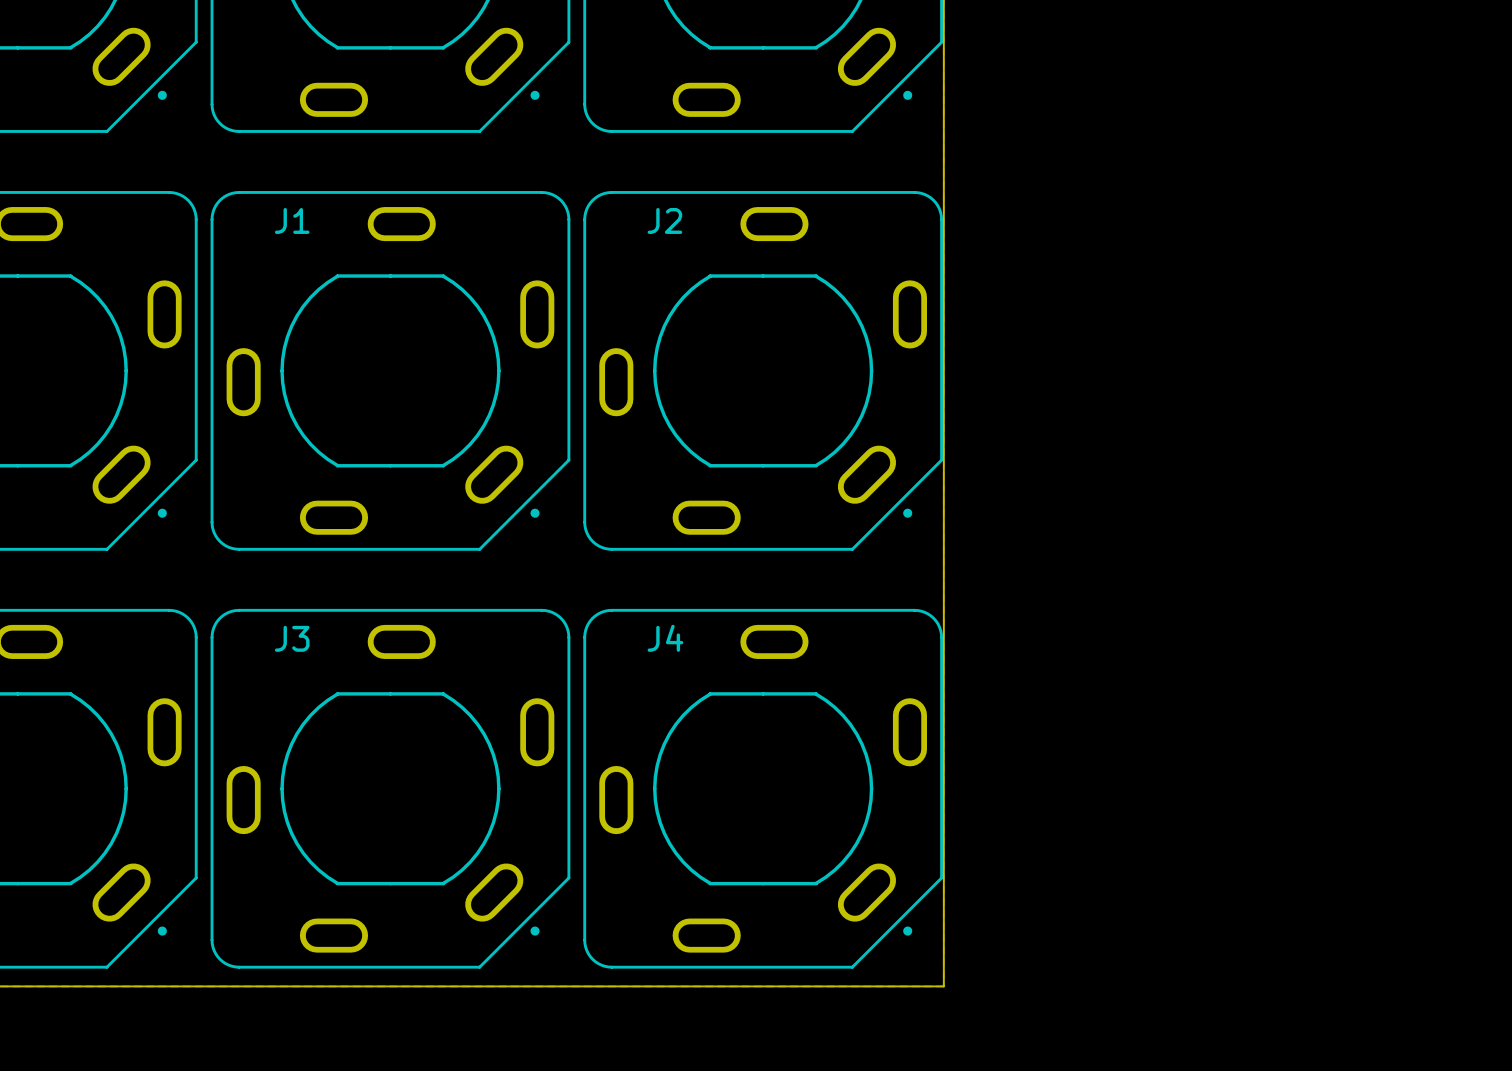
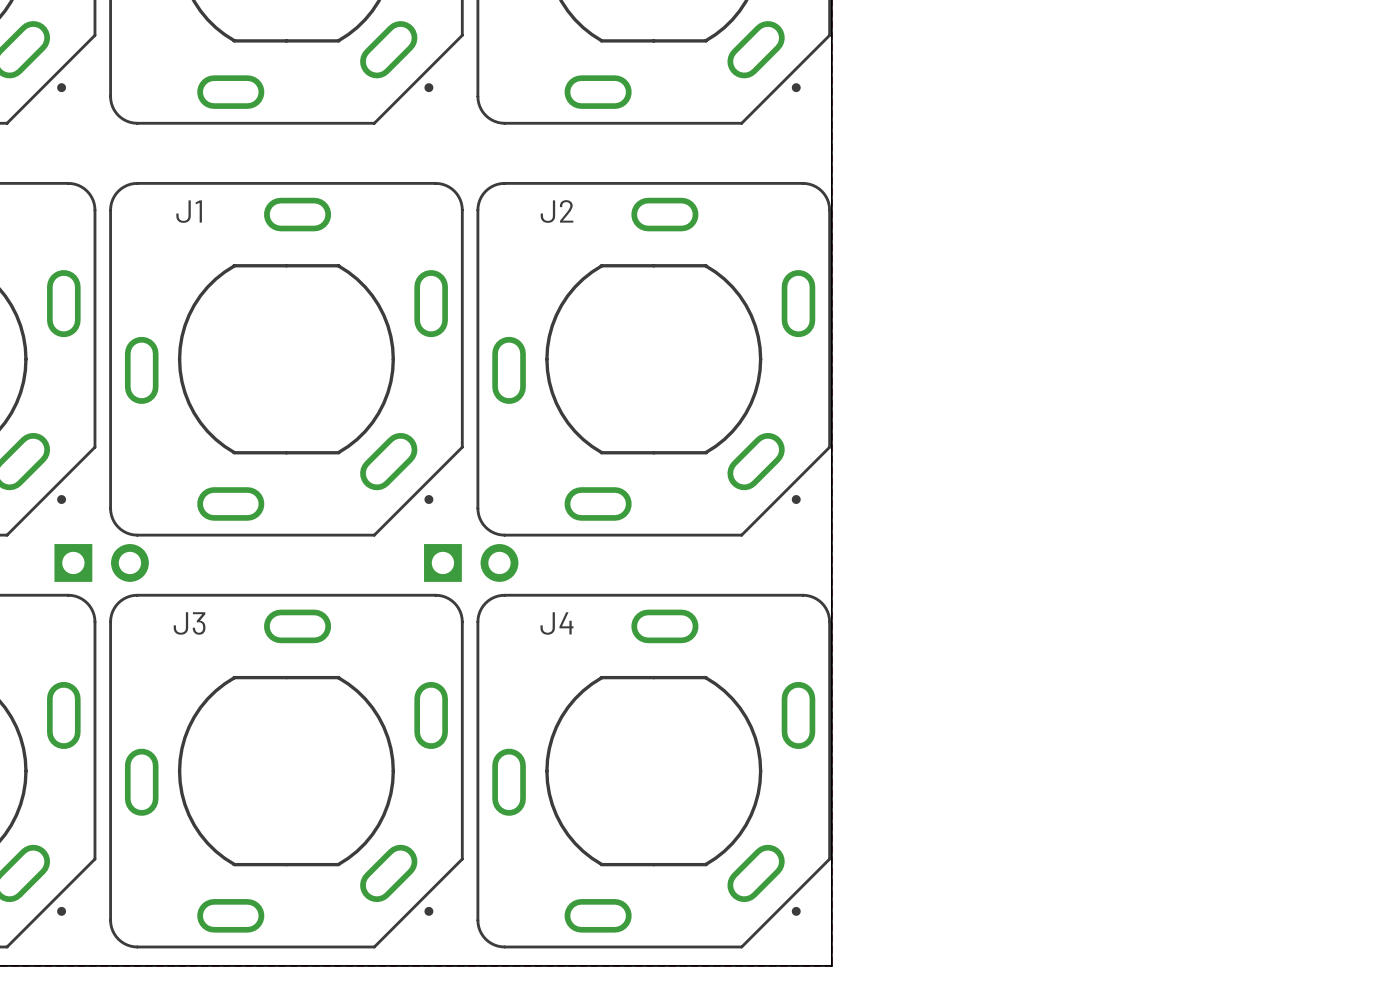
part: none -> (101, 562)
part: none -> (471, 562)

